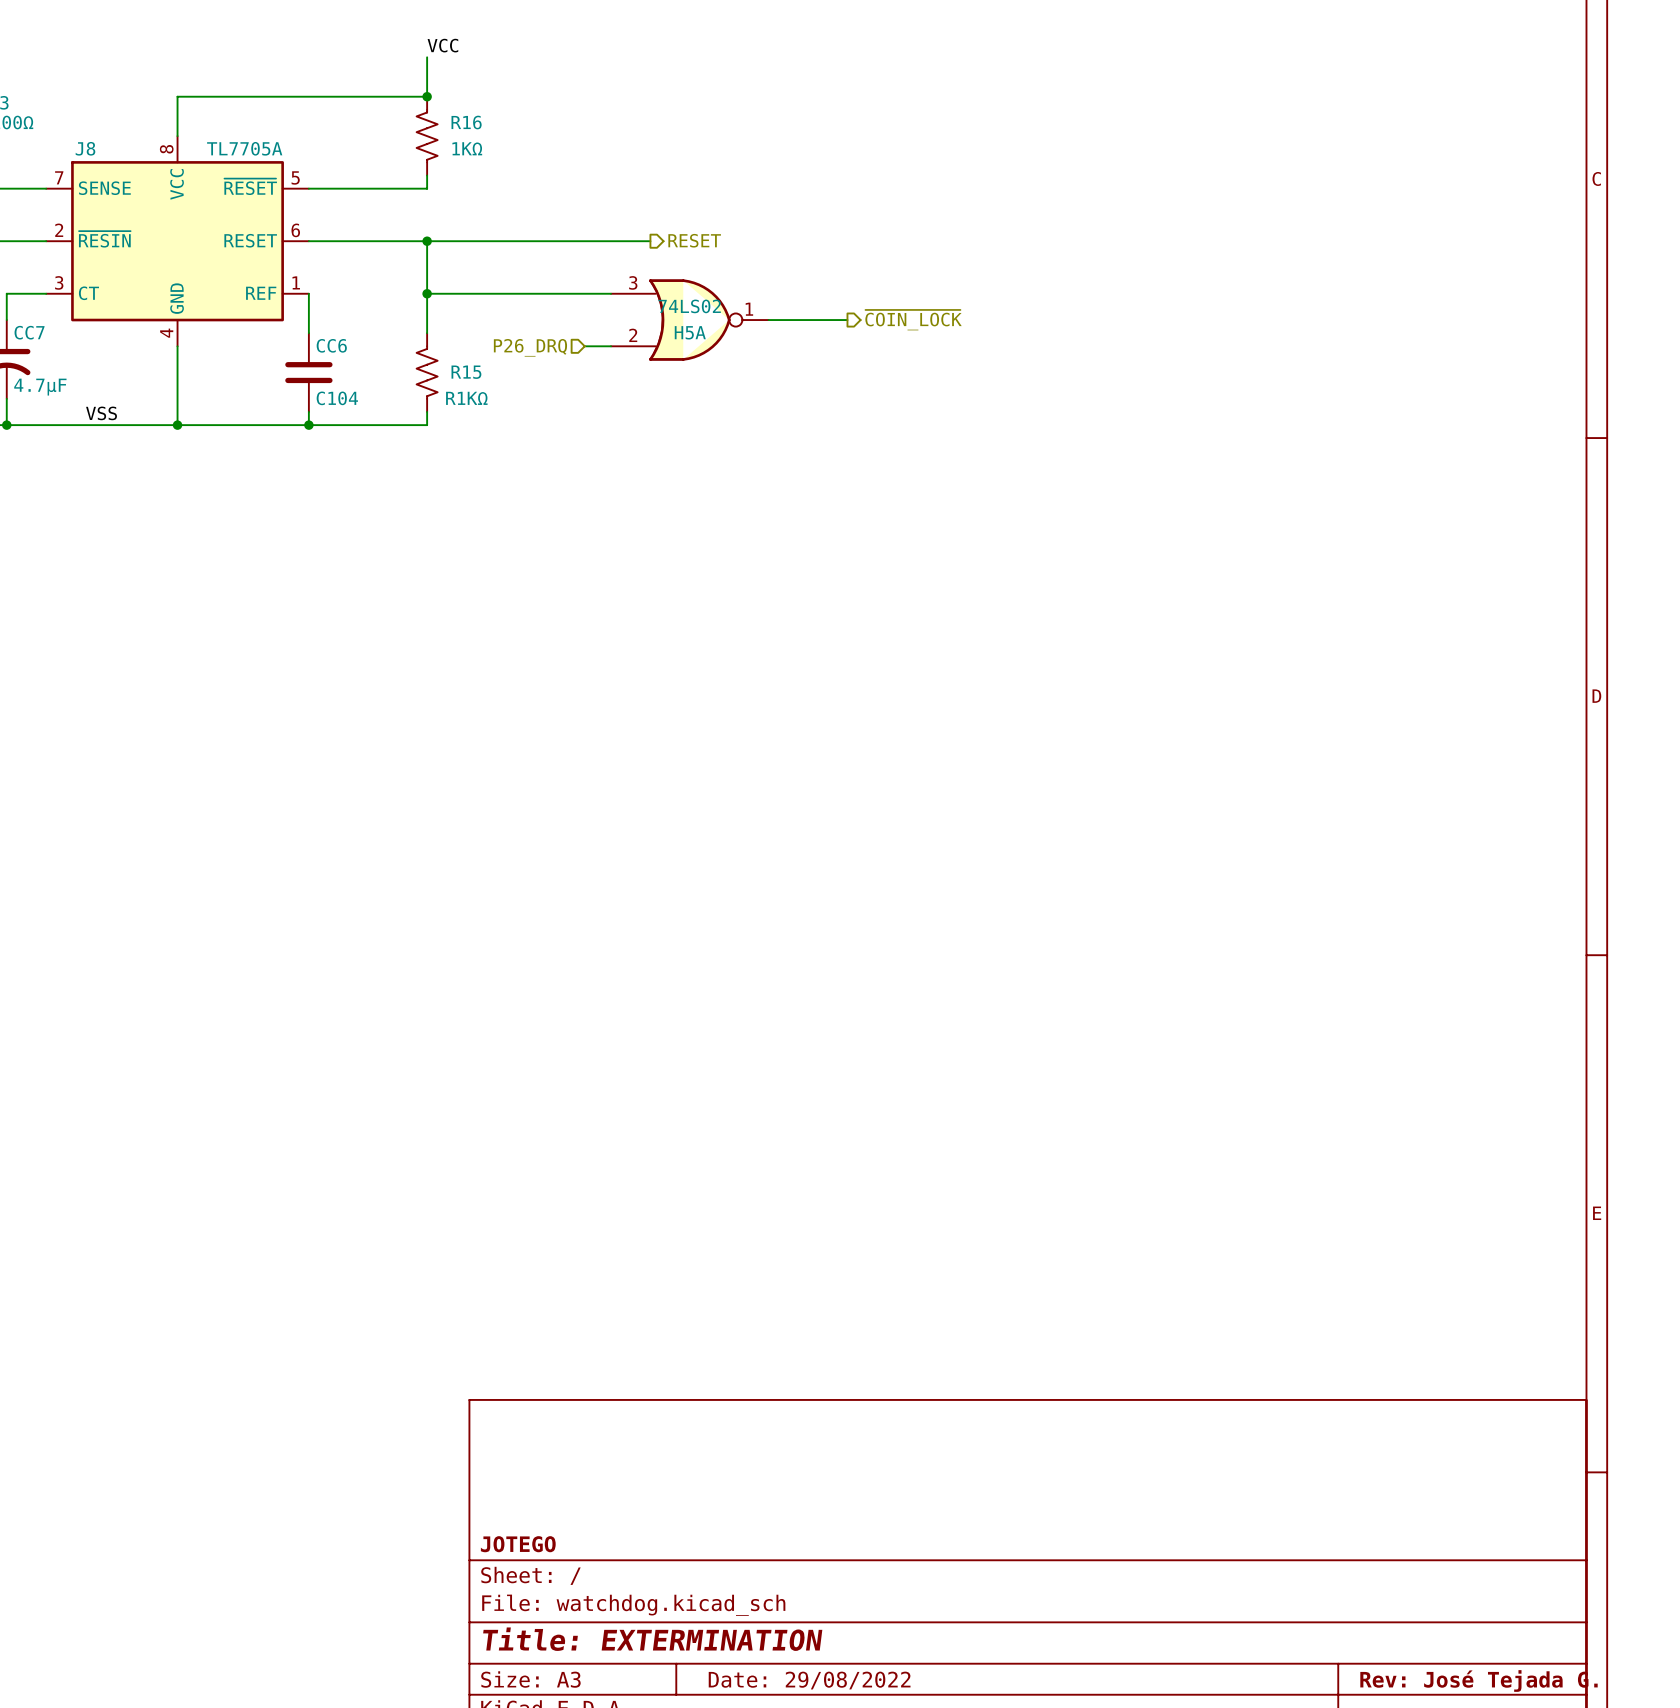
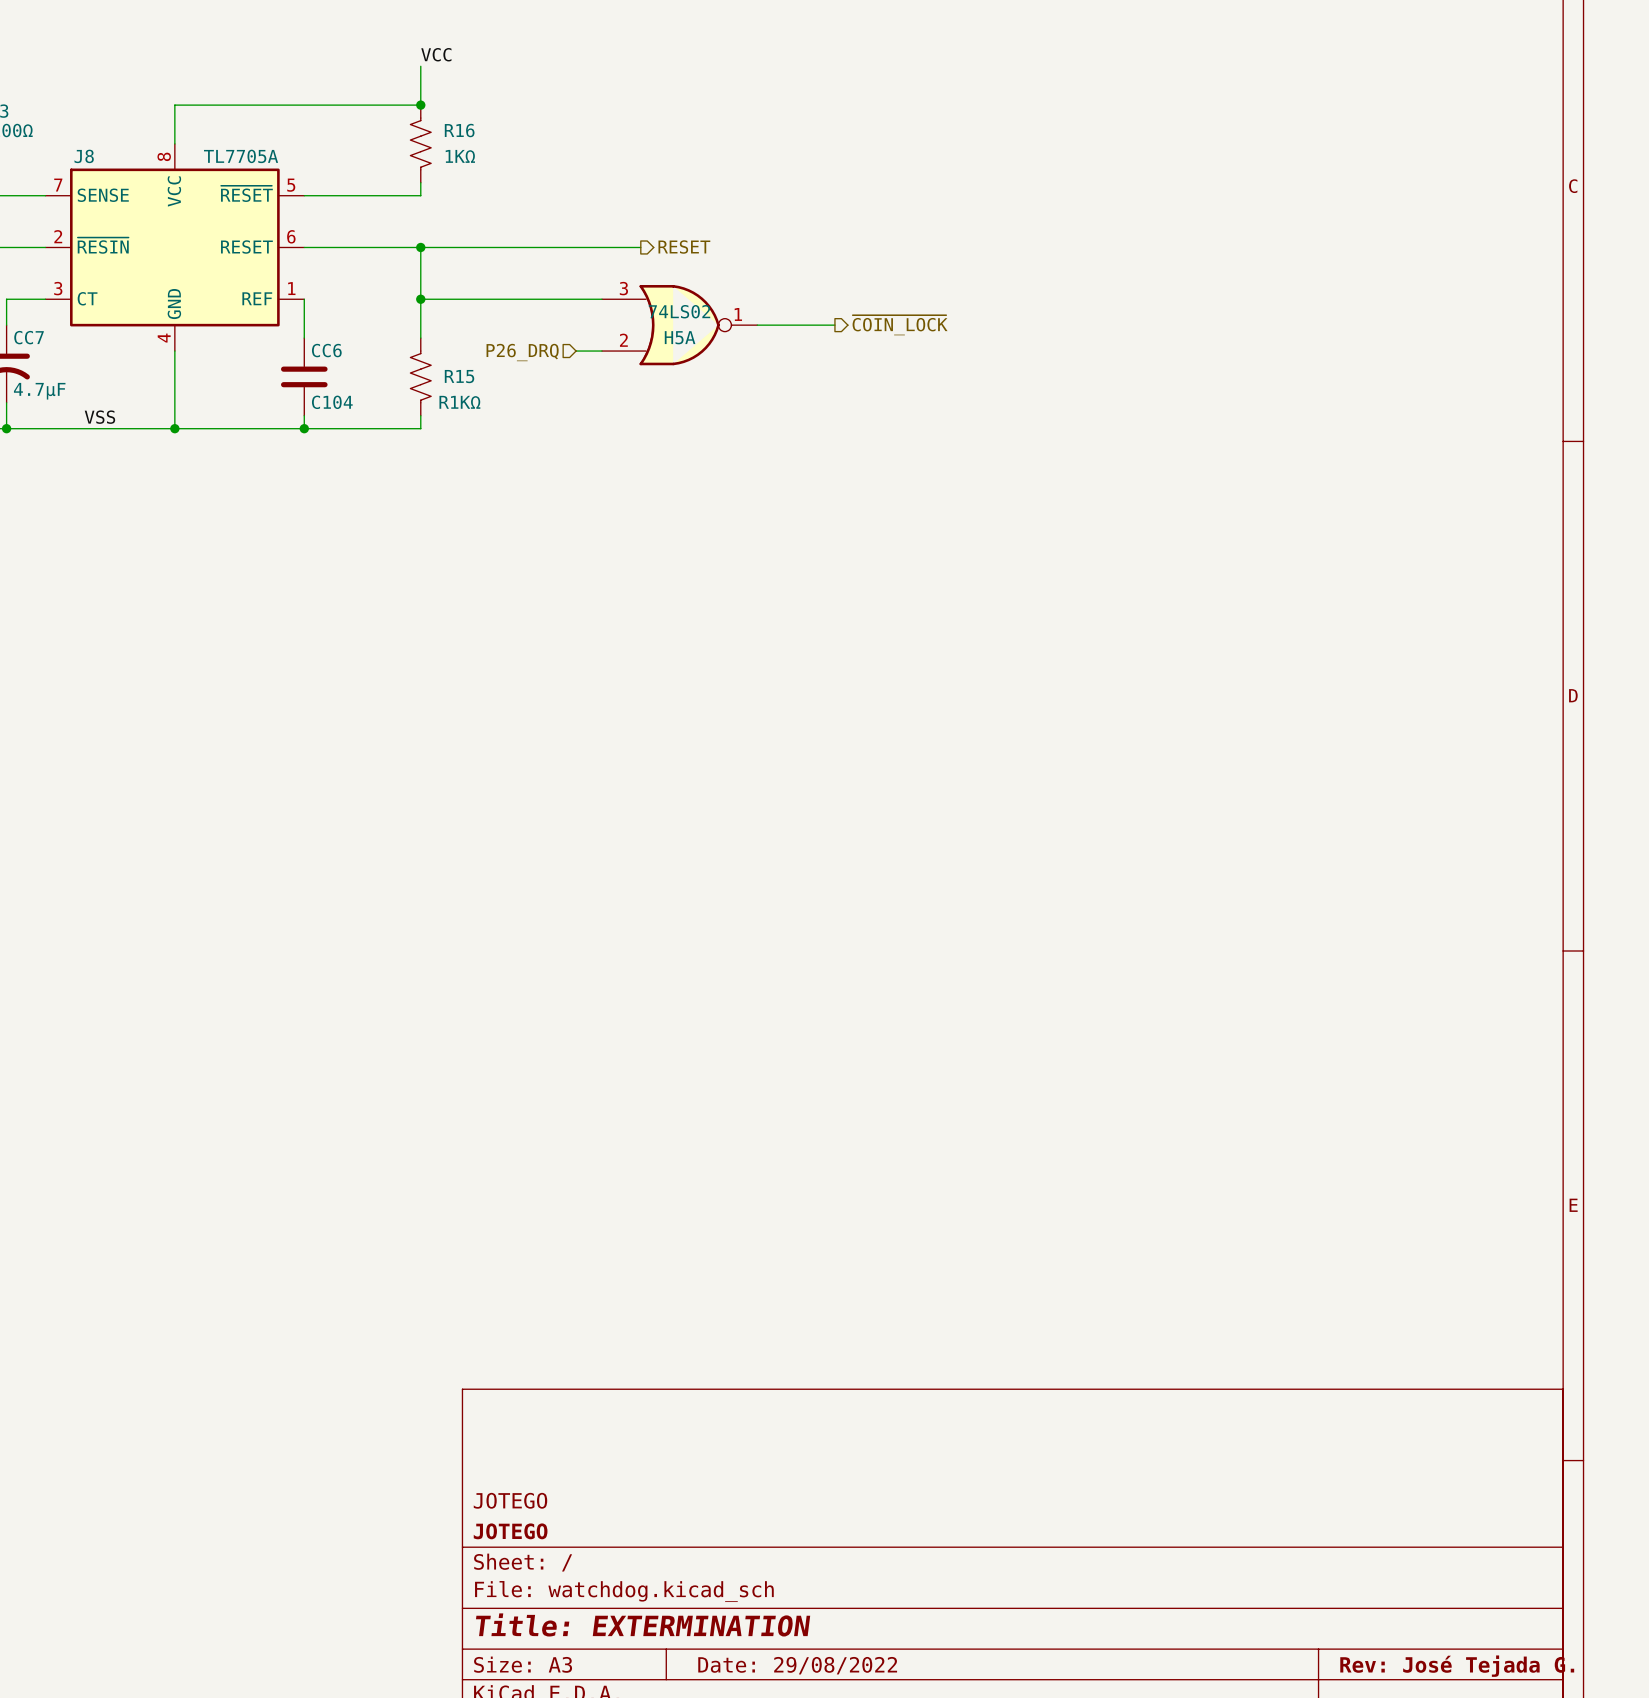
title block: none -> JOTEGO (510, 1500)

